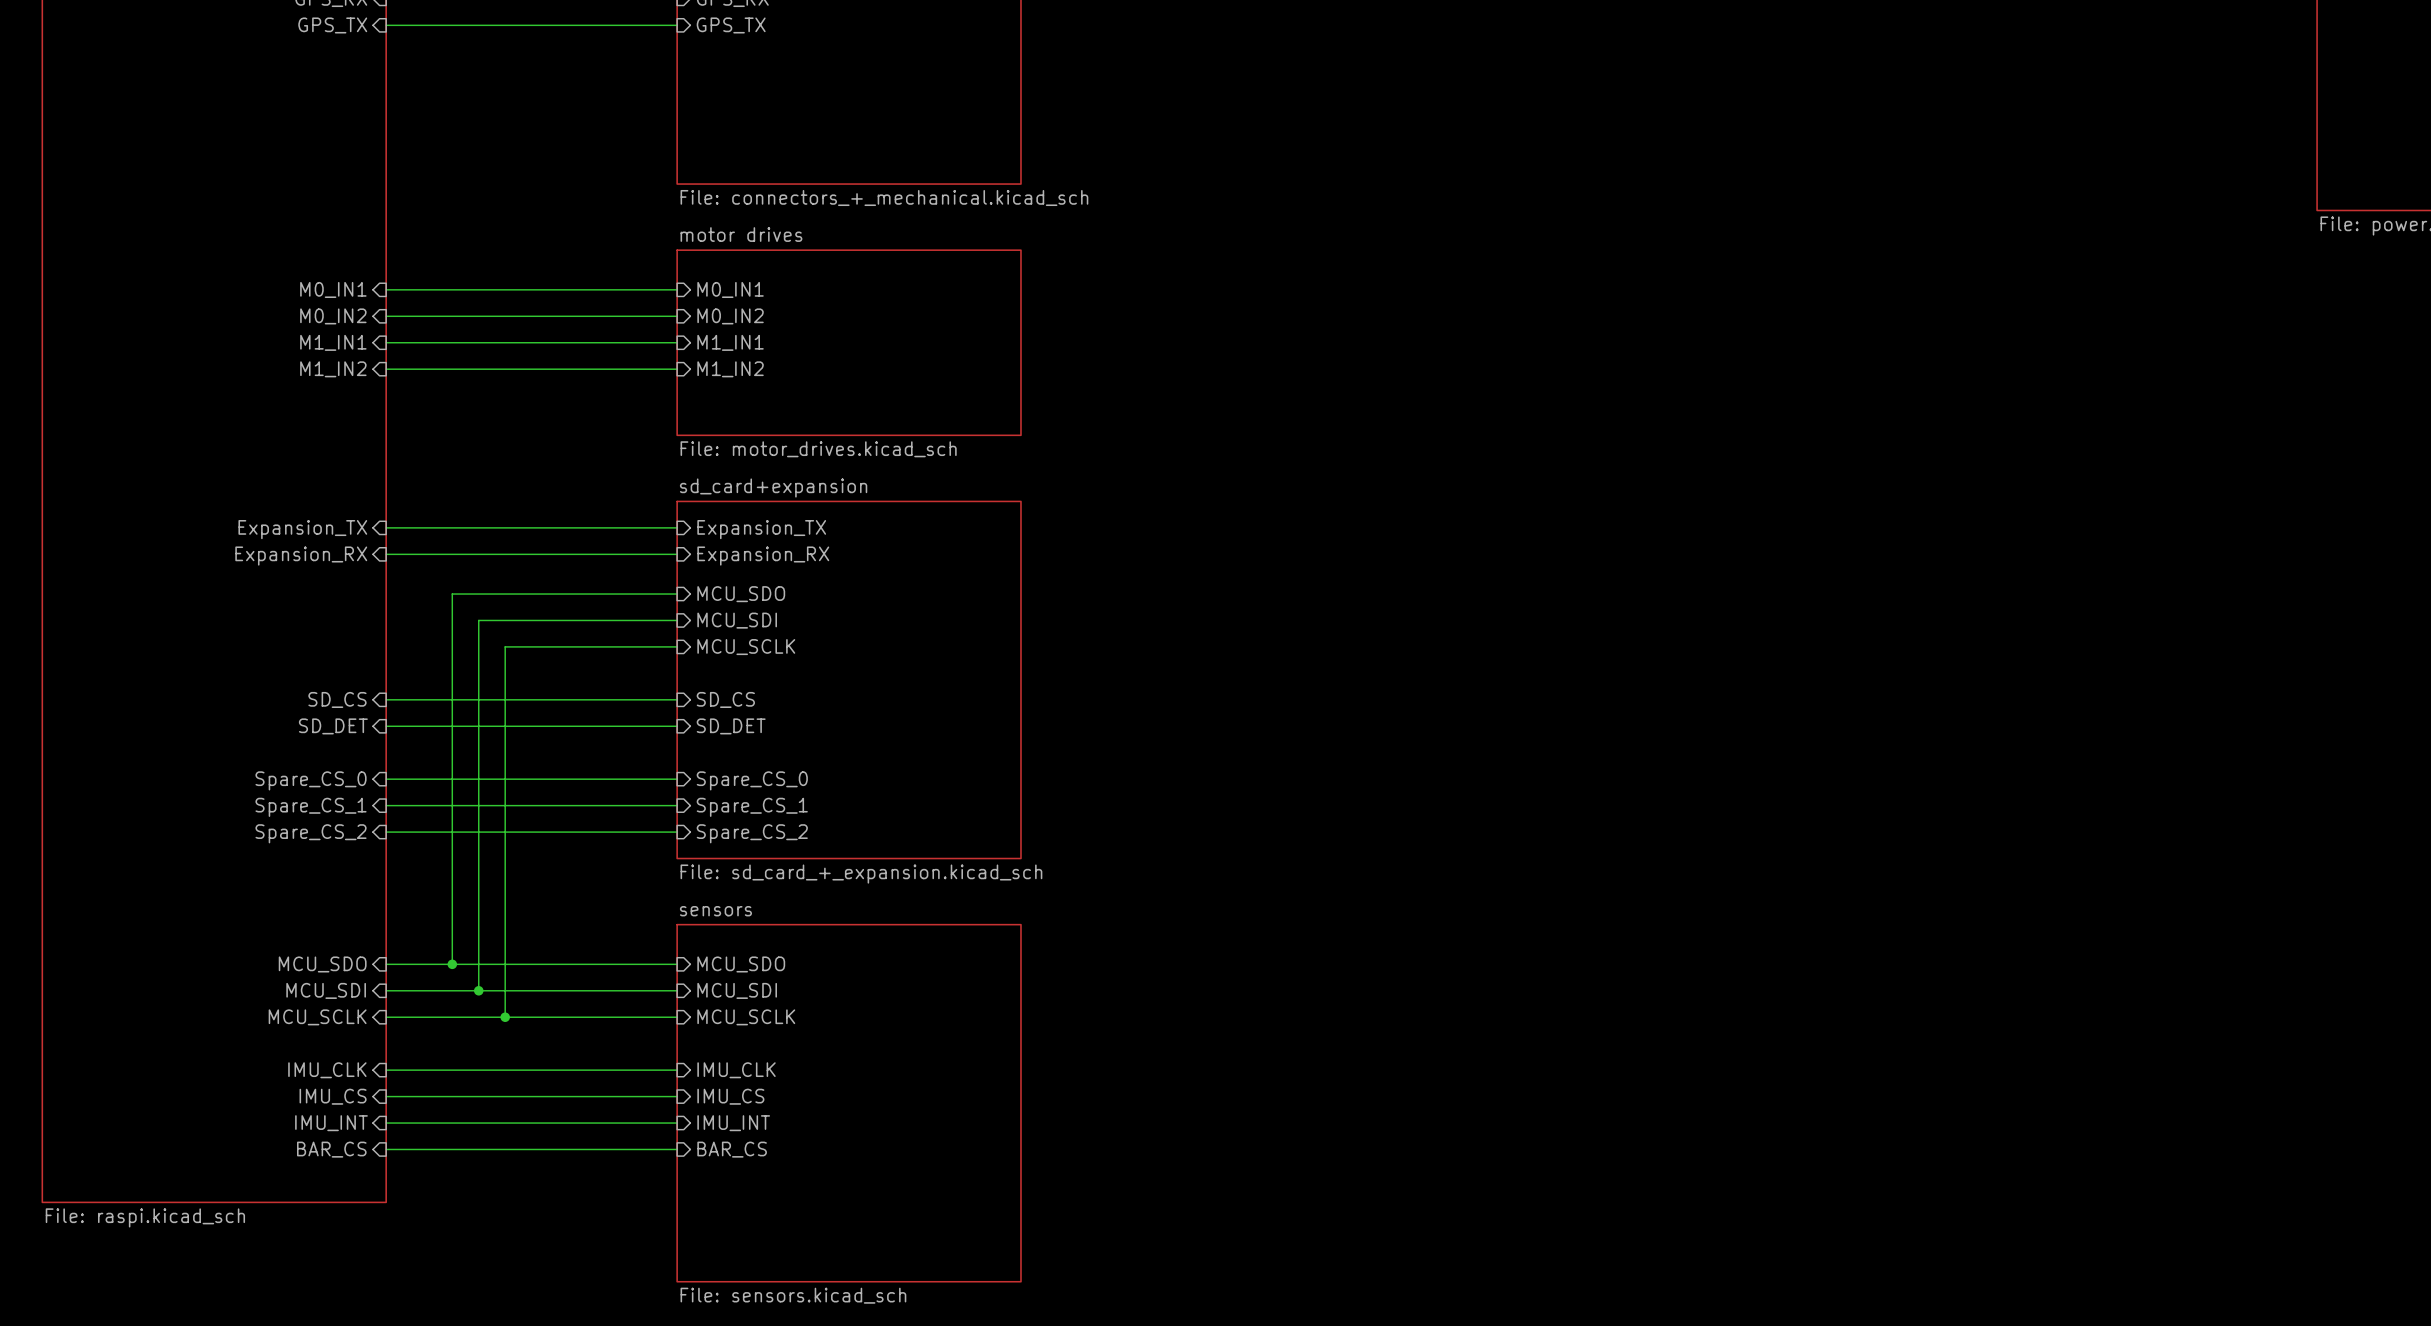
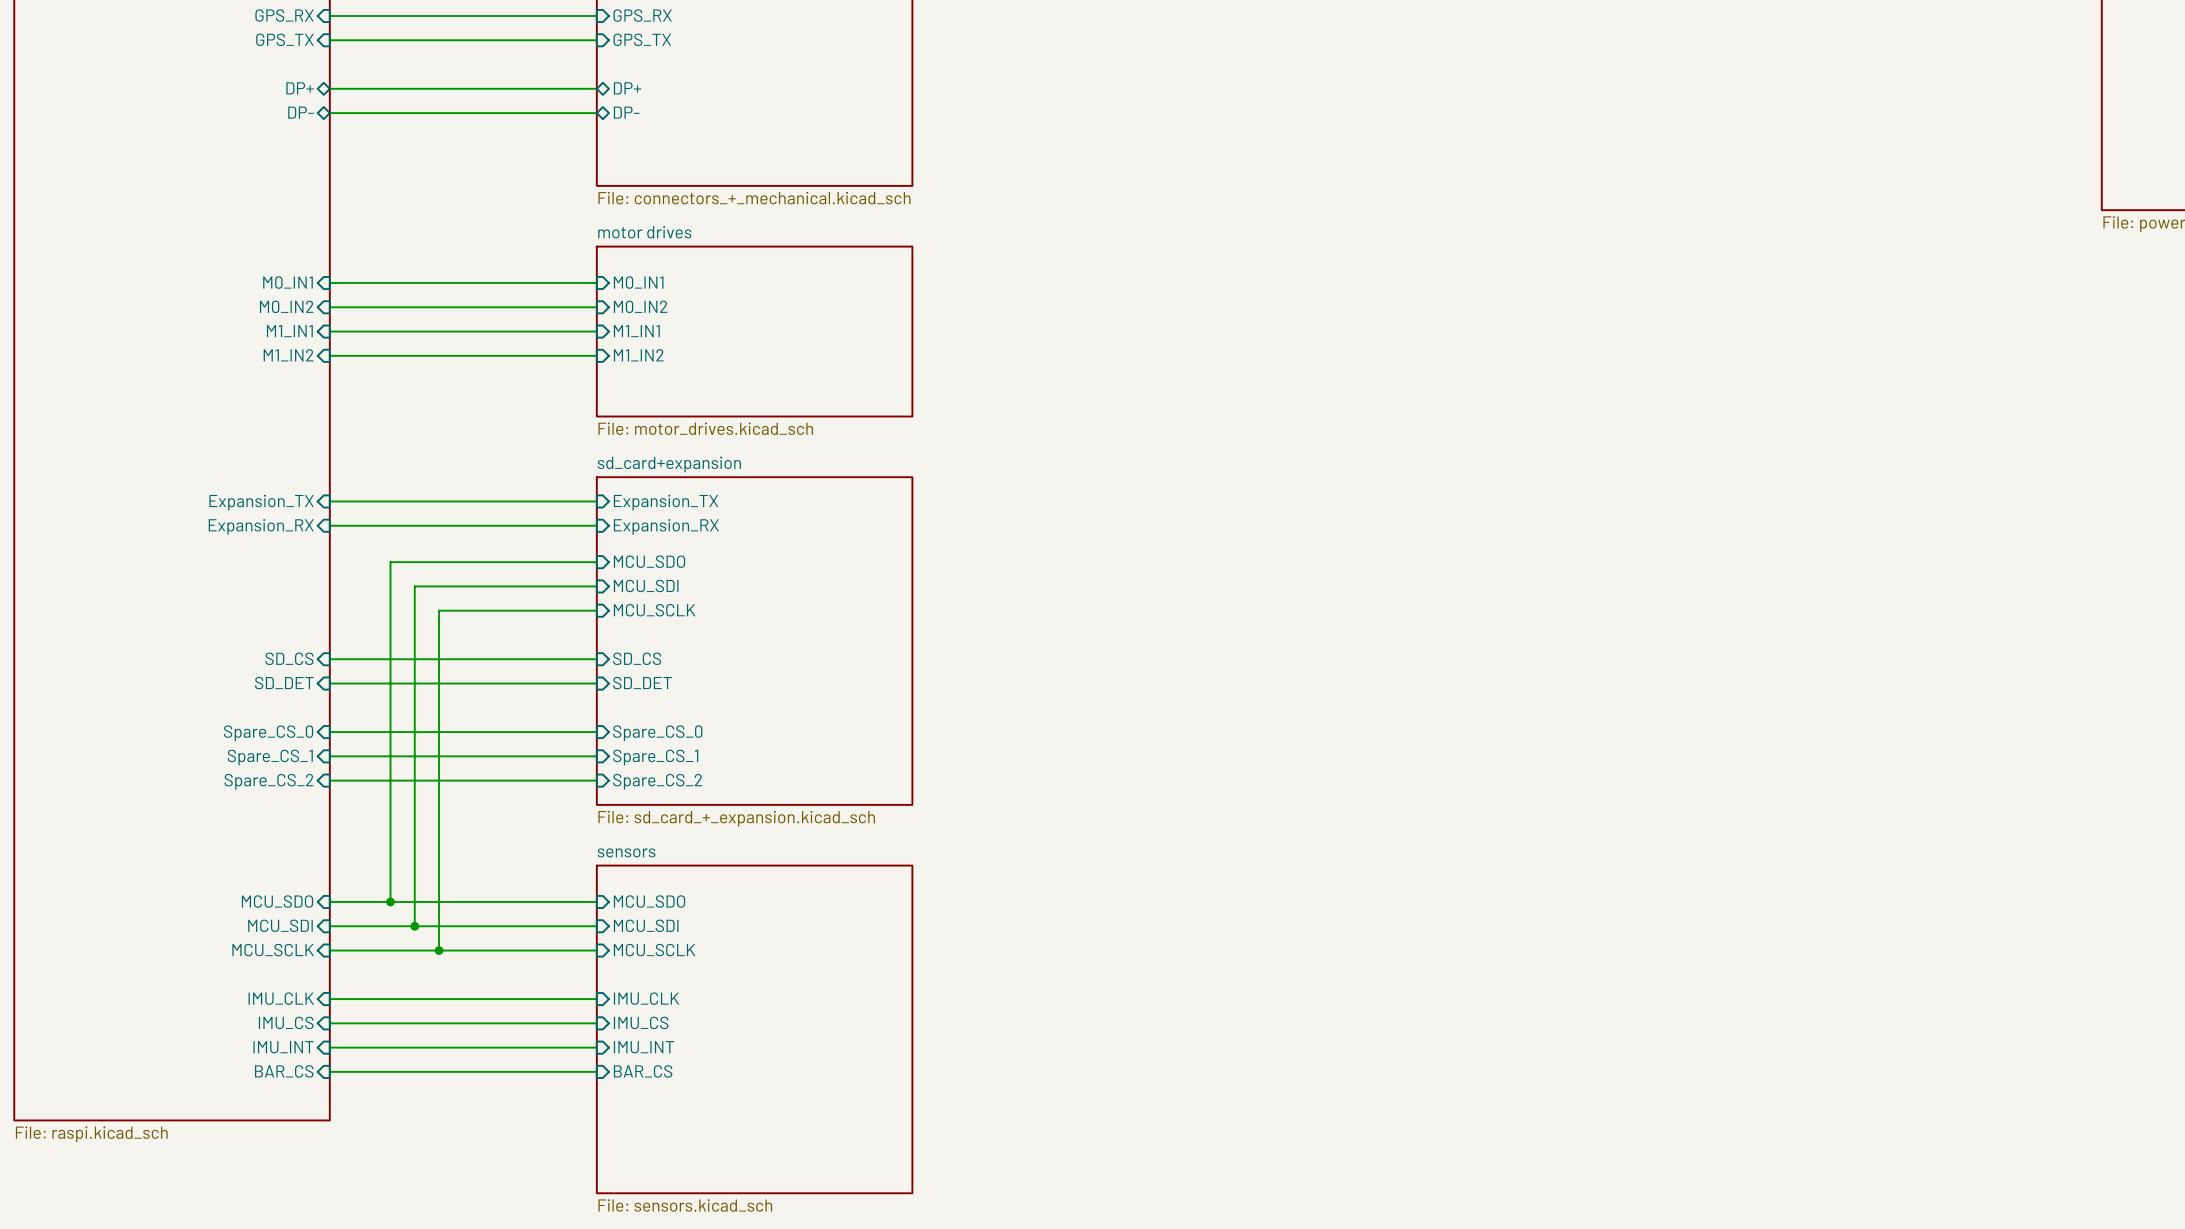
sheet pin: none -> DP+ (300, 88)
sheet pin: none -> DP+ (627, 88)
wire: none -> (329, 88) (596, 88)
sheet pin: none -> DP- (300, 112)
wire: none -> (329, 113) (596, 113)
sheet pin: none -> DP- (626, 112)

